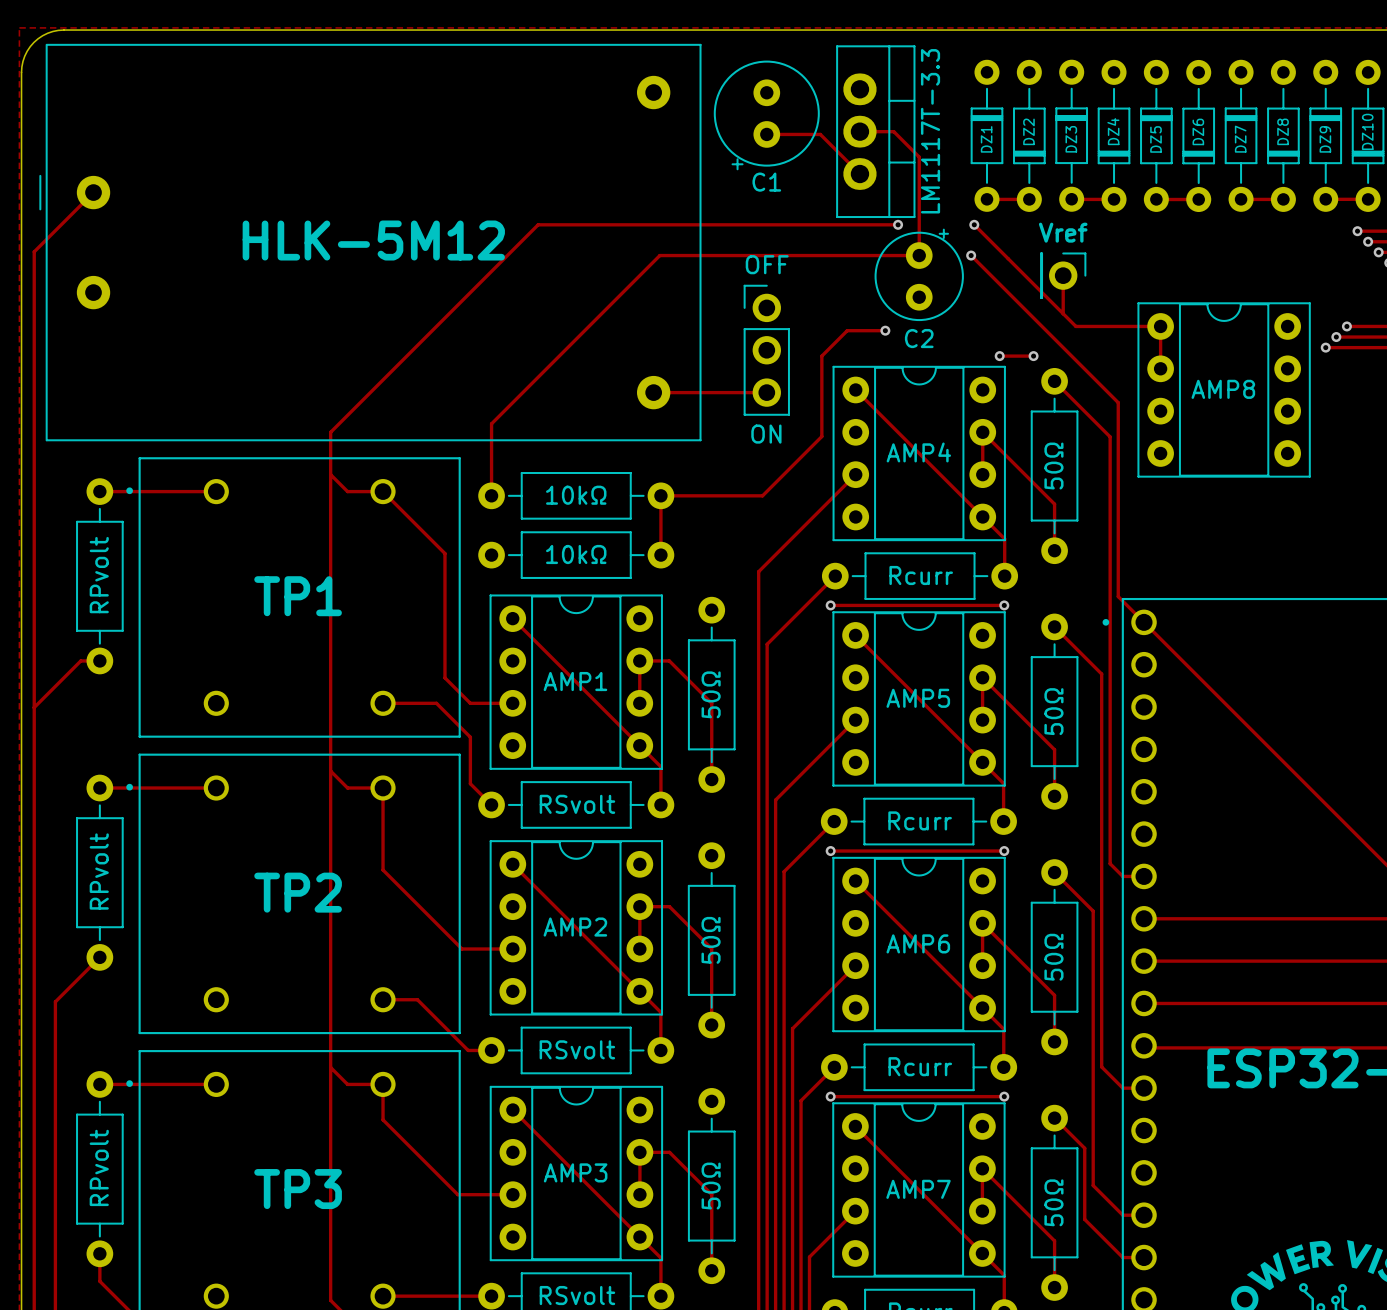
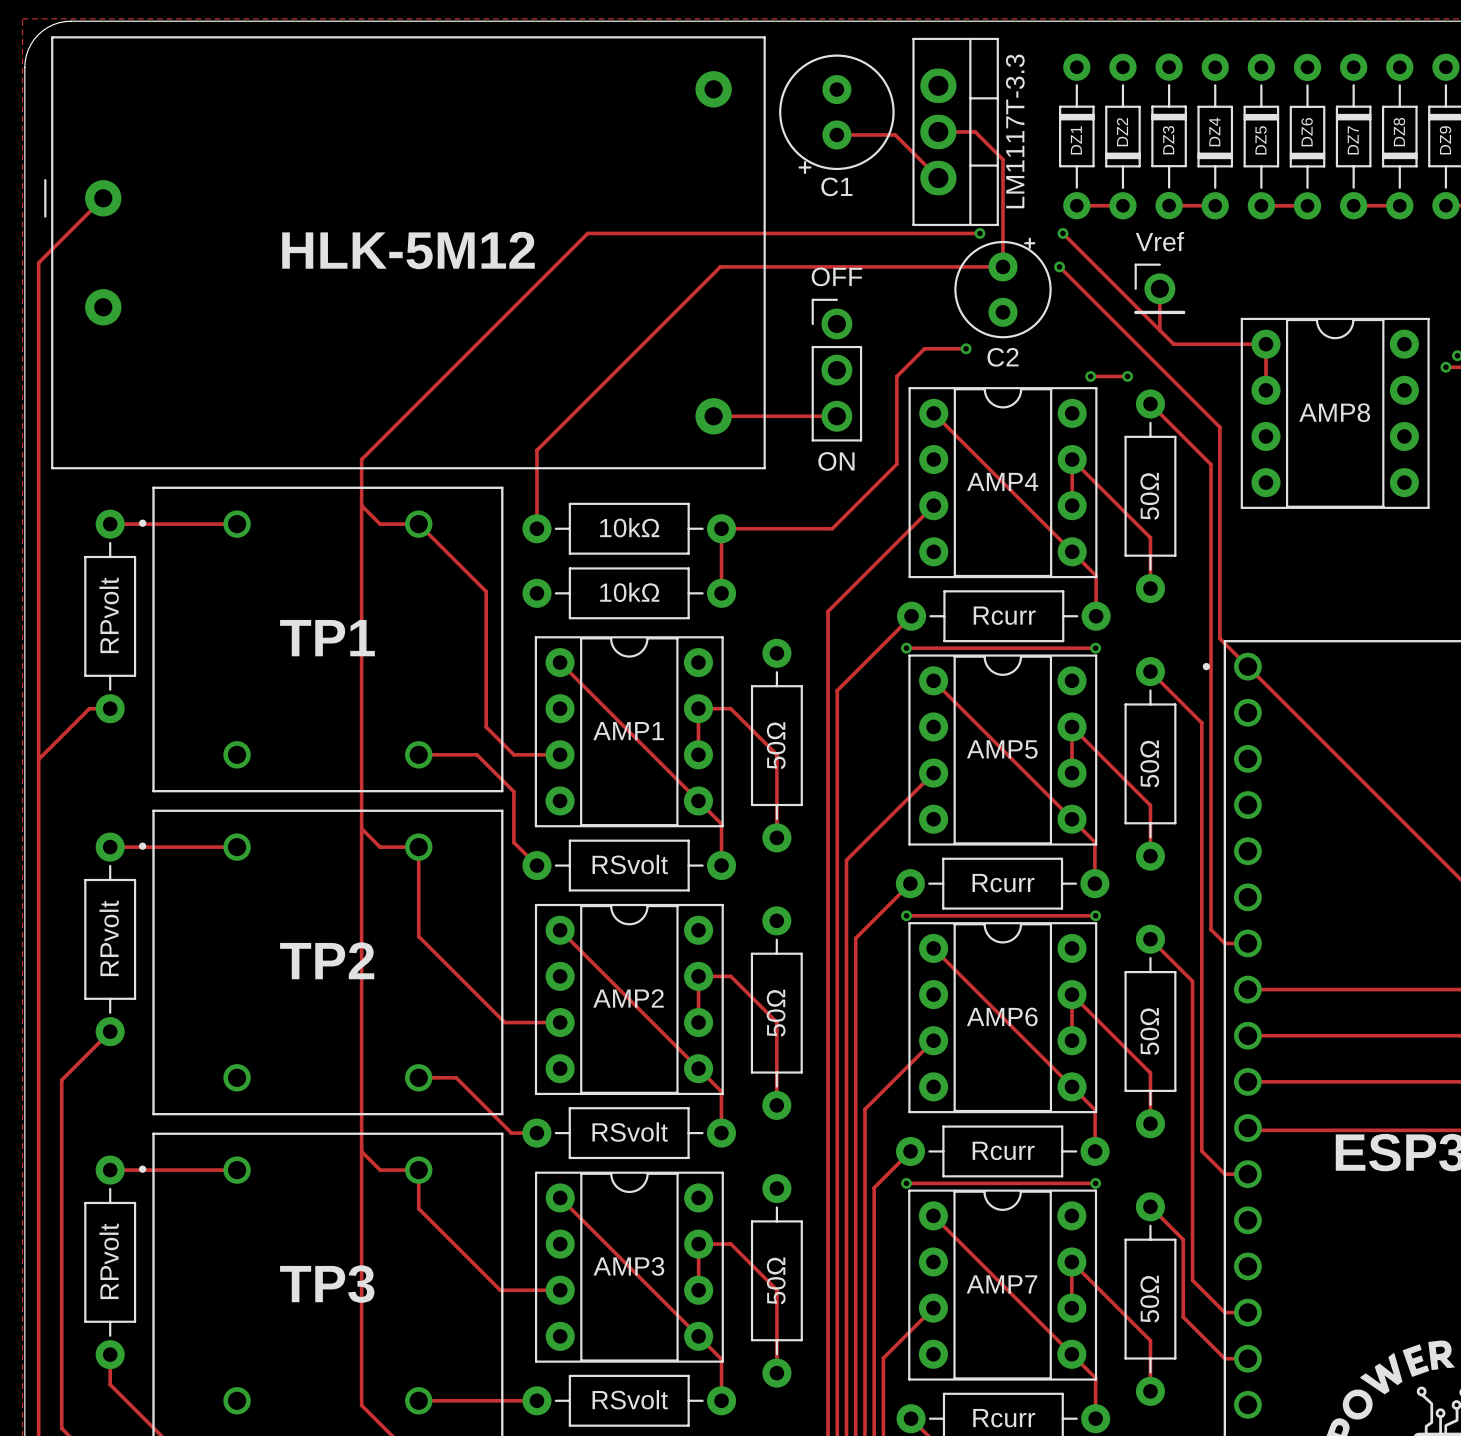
part footprint: [1040, 252, 1087, 299] -> [1134, 263, 1186, 315]

